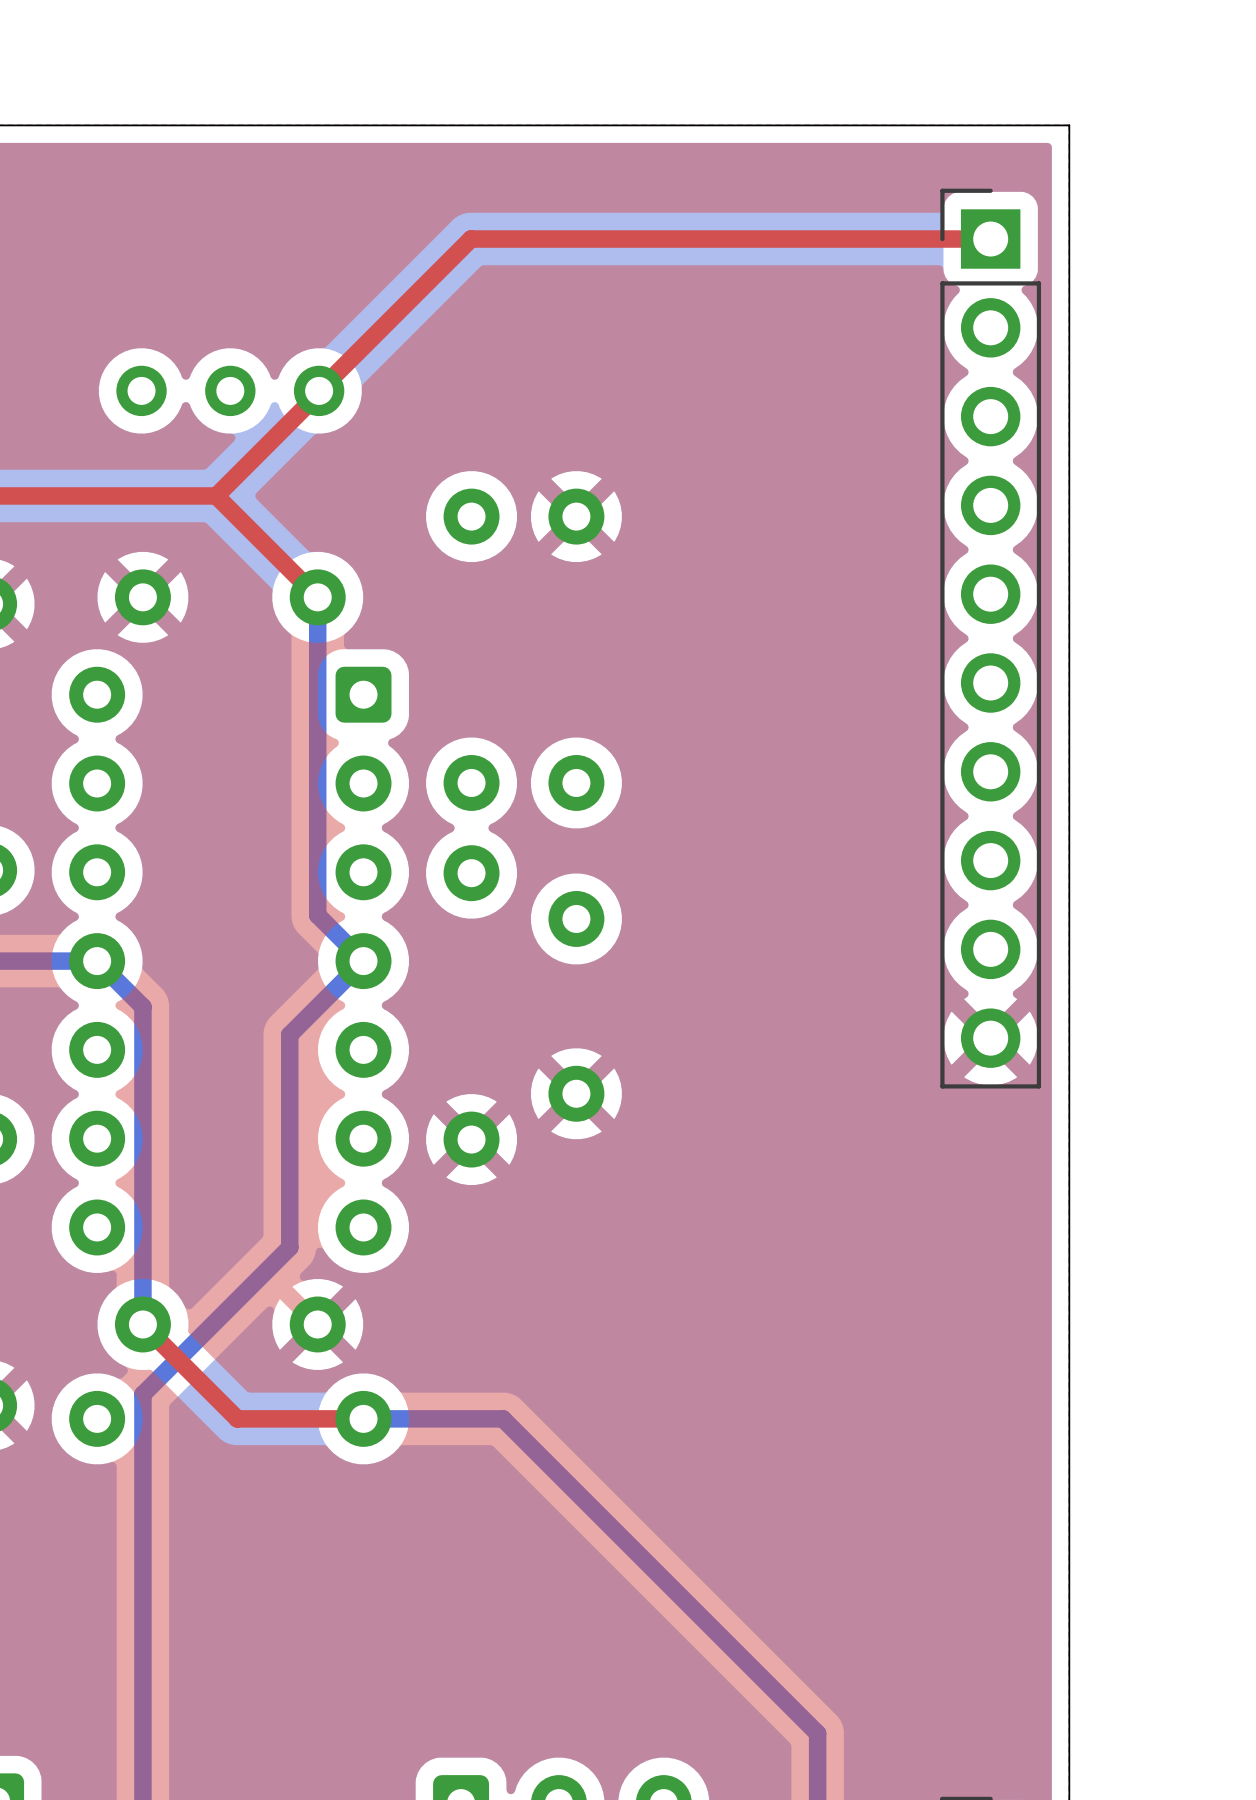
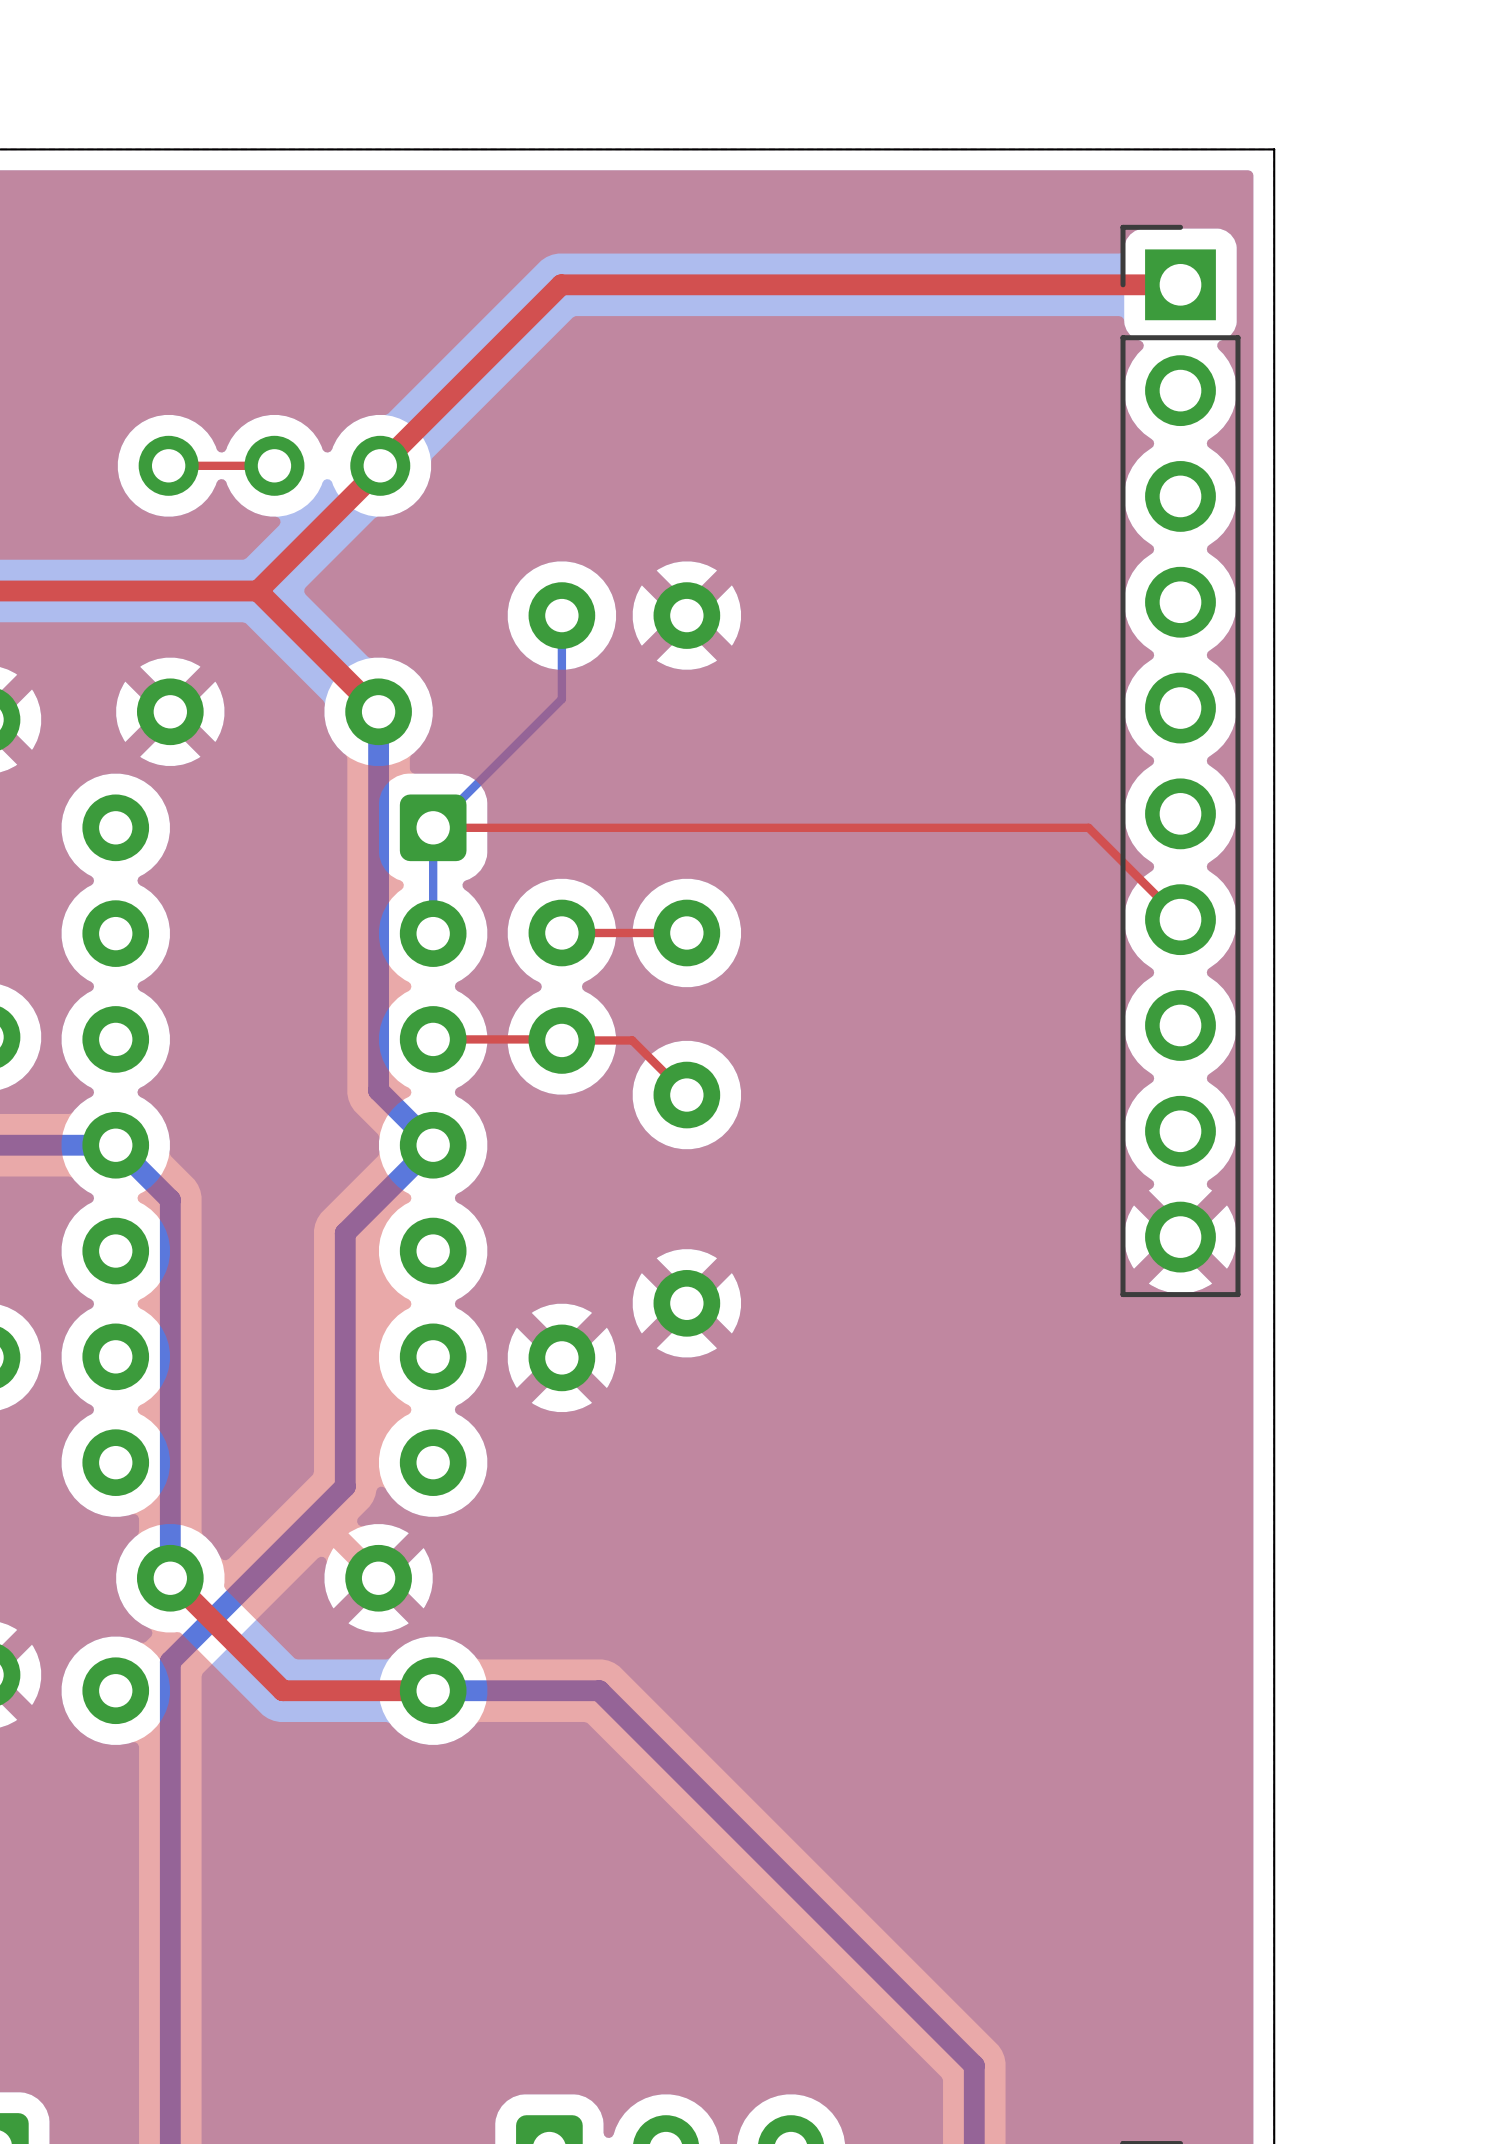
top track: none -> (168, 465) (274, 465)
bottom track: none -> (561, 615) (561, 699) (433, 827) (433, 933)
top track: none -> (433, 827) (1088, 827) (1180, 919)
top track: none -> (561, 932) (686, 932)
top track: none -> (433, 1039) (632, 1040) (686, 1095)

